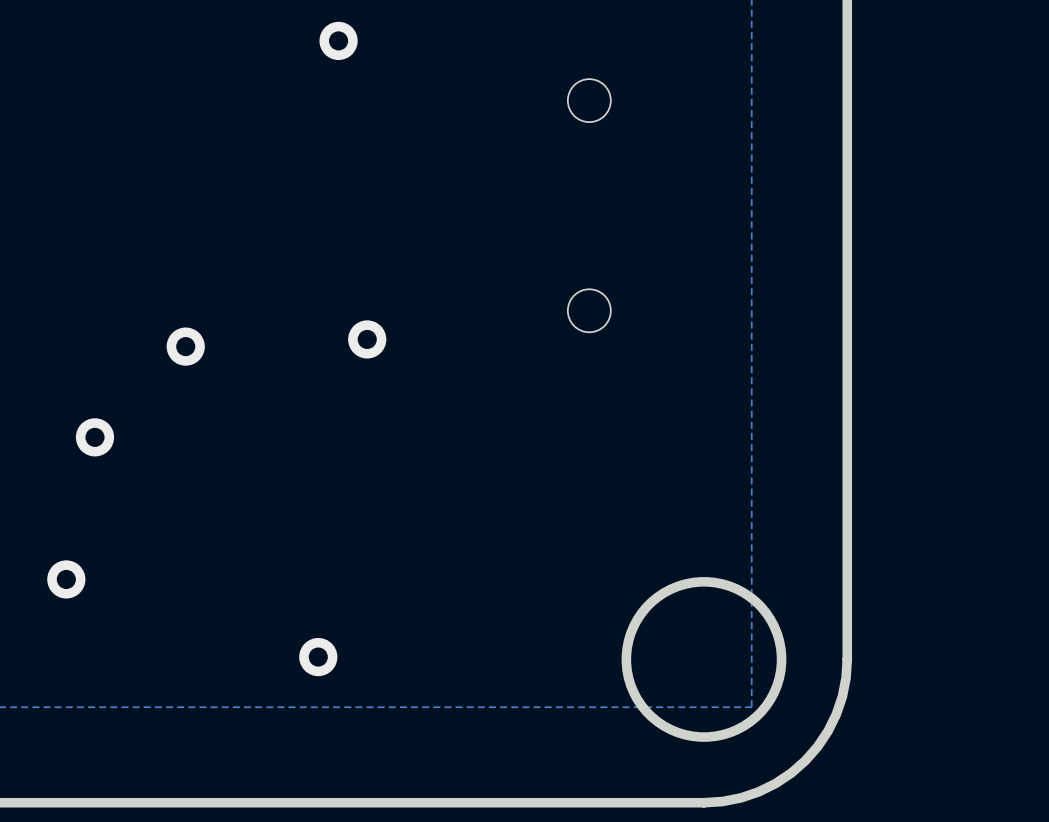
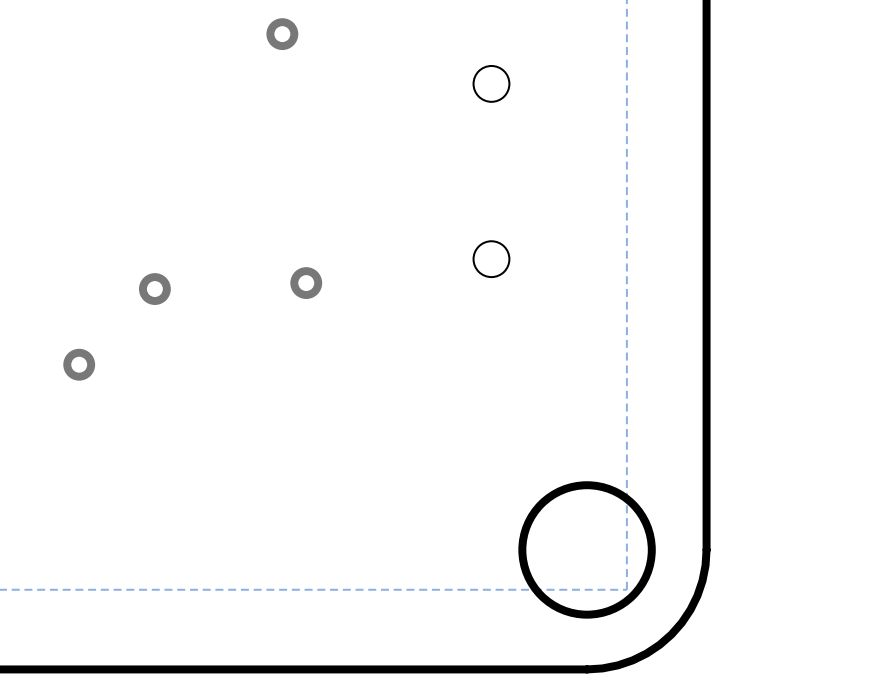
via: (66, 579) -> none
via: (318, 657) -> none

